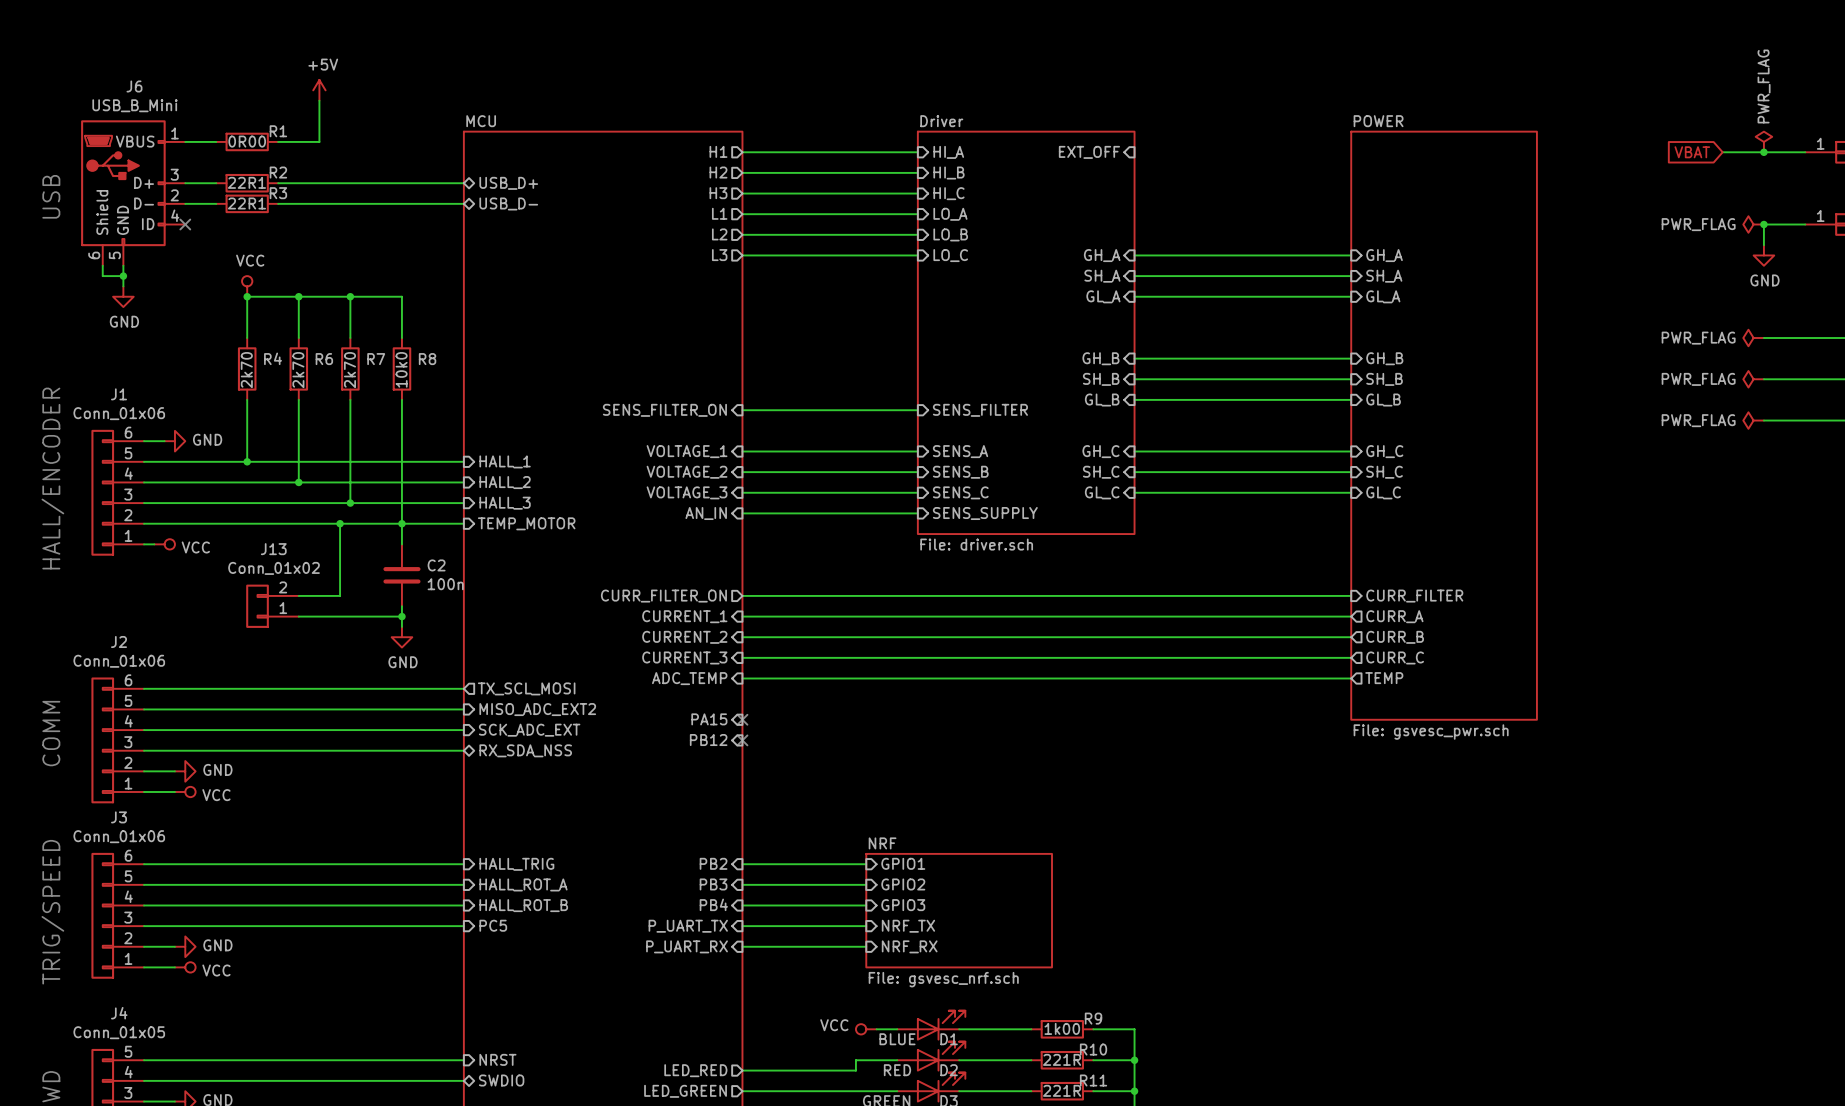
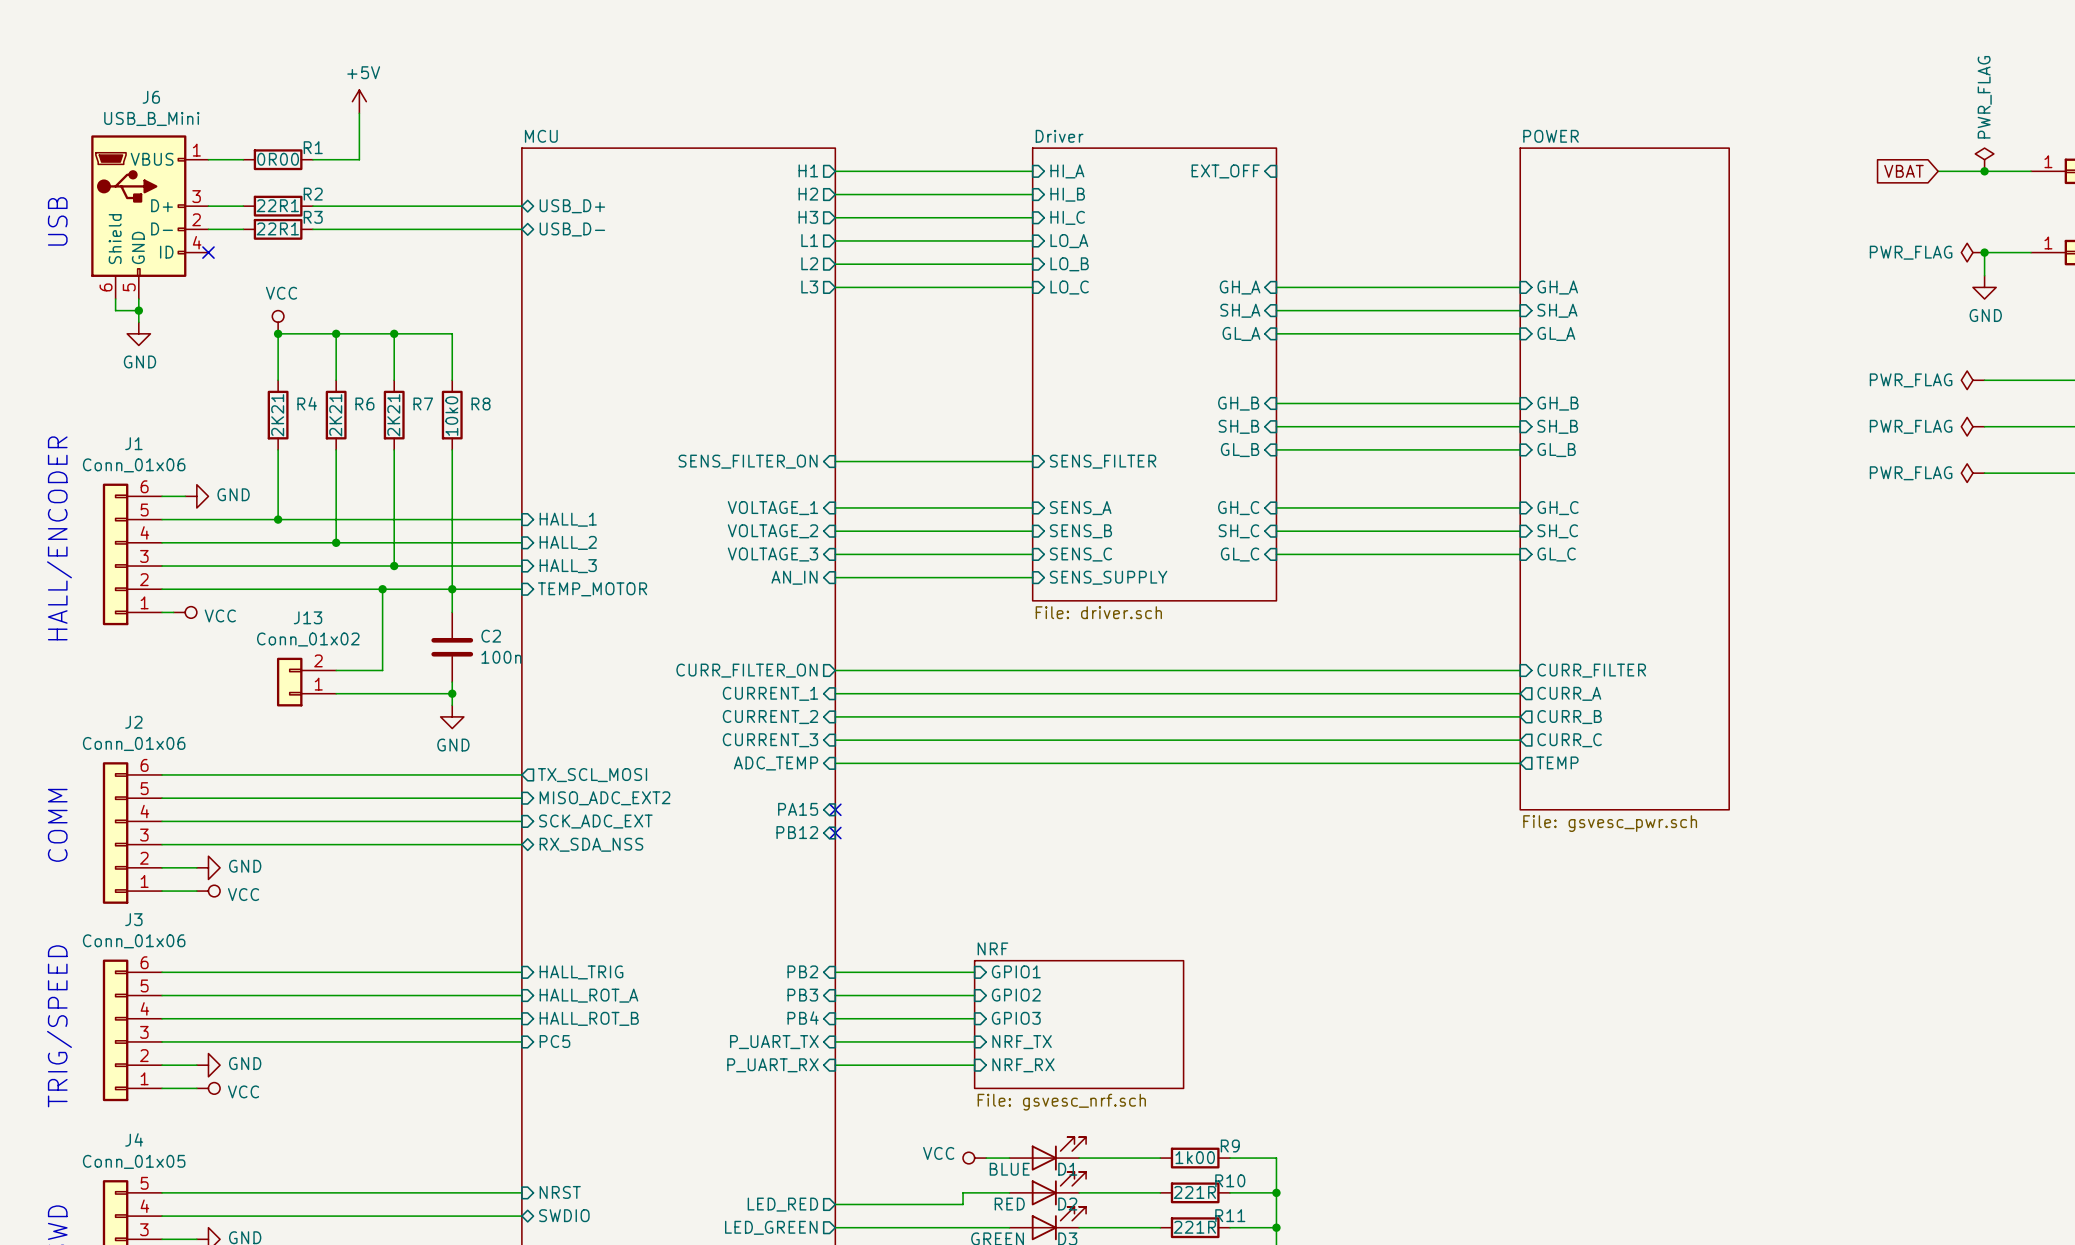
R4 value: 2k70 (246, 370) -> 2K21 (277, 415)
R6 value: 2k70 (298, 370) -> 2K21 (335, 415)
R7 value: 2k70 (349, 370) -> 2K21 (393, 415)

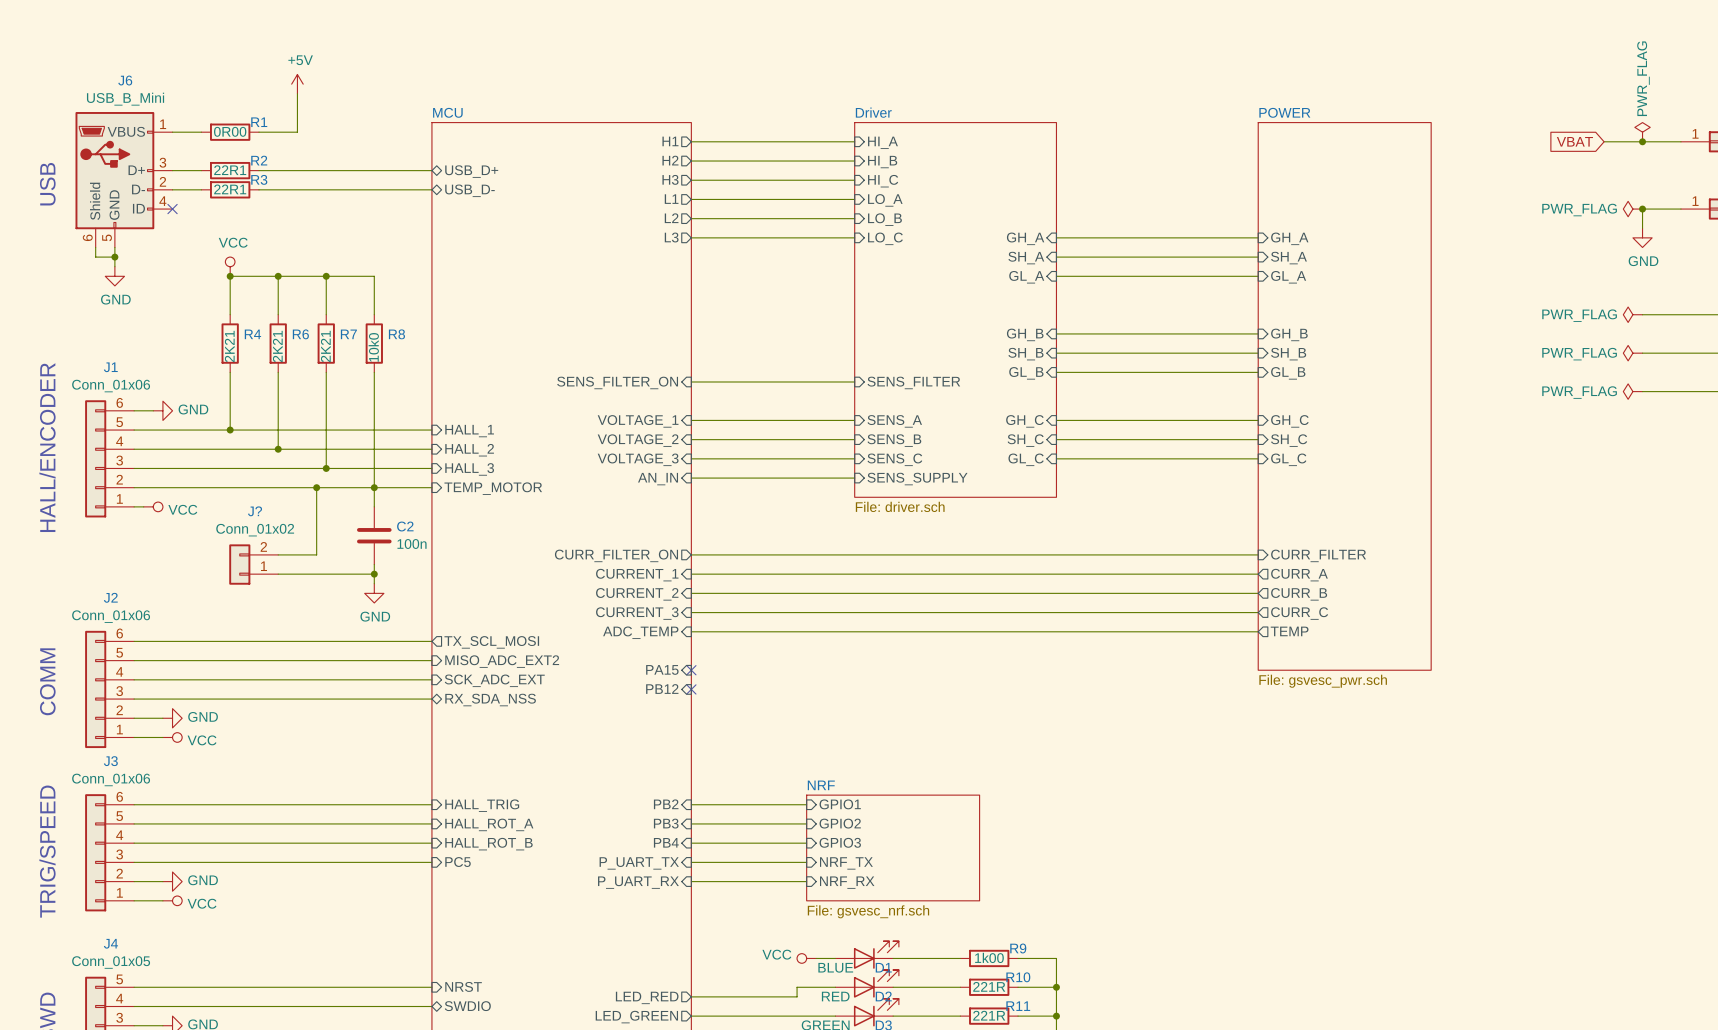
sheet pin: EXT_OFF (1225, 171) -> none
J13 name: J13 (308, 617) -> J? (255, 511)

